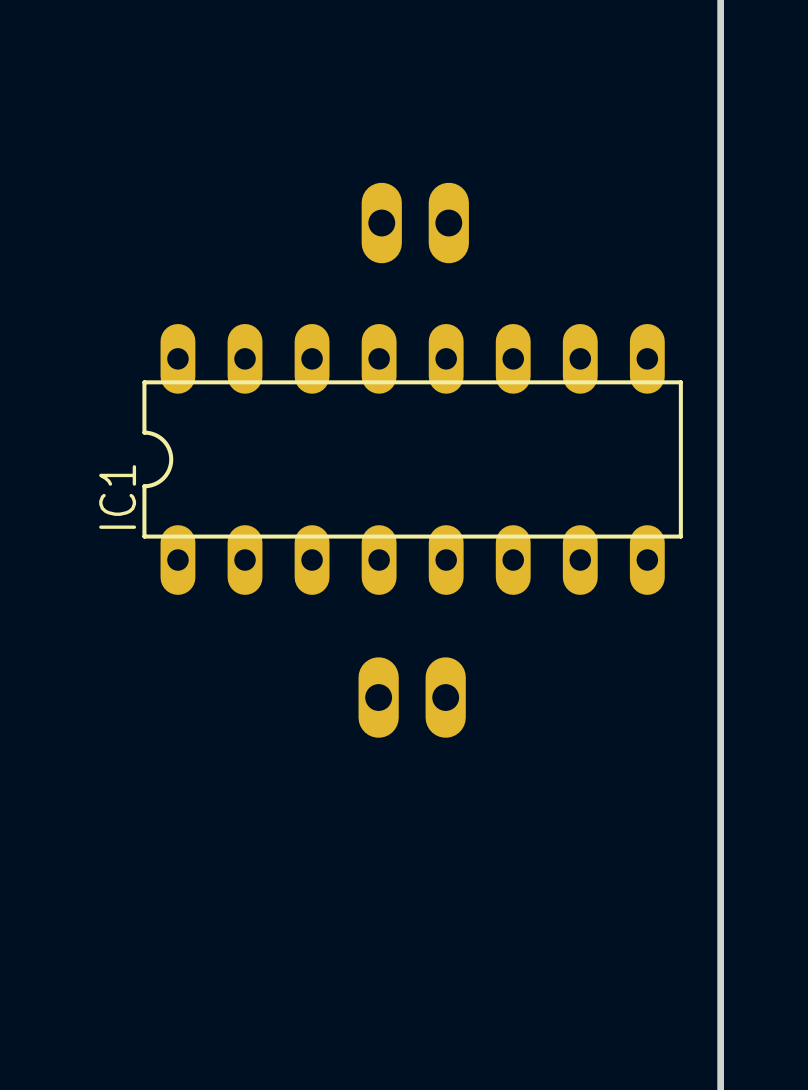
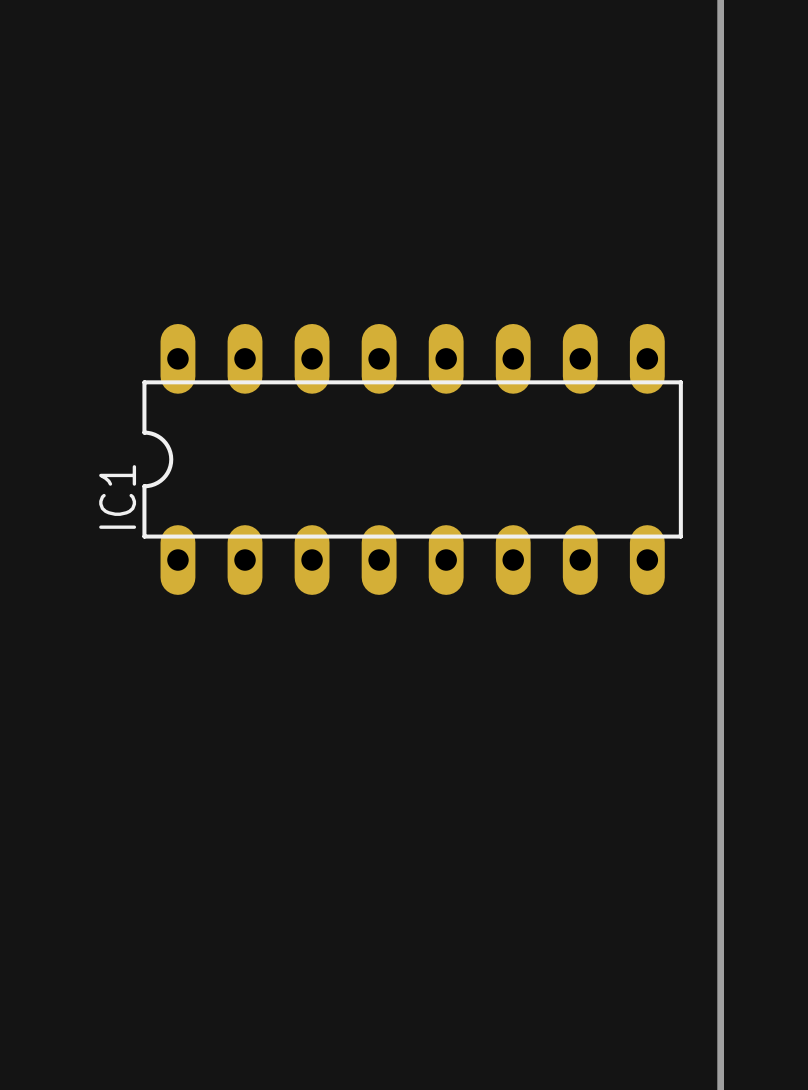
part: (415, 223) -> none
part: (412, 697) -> none

